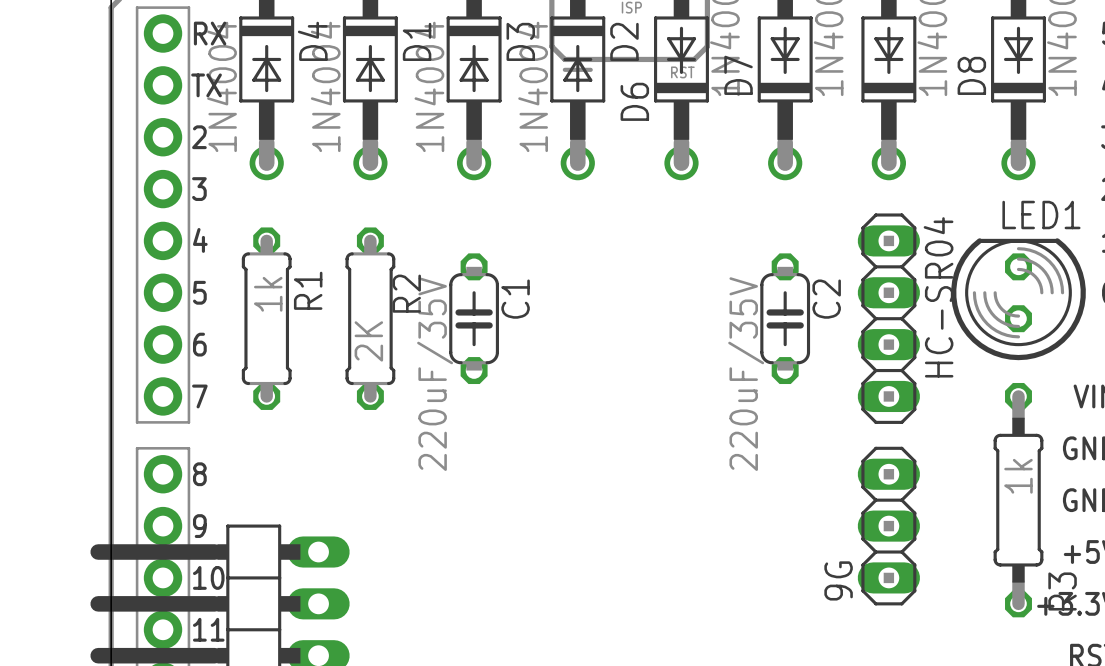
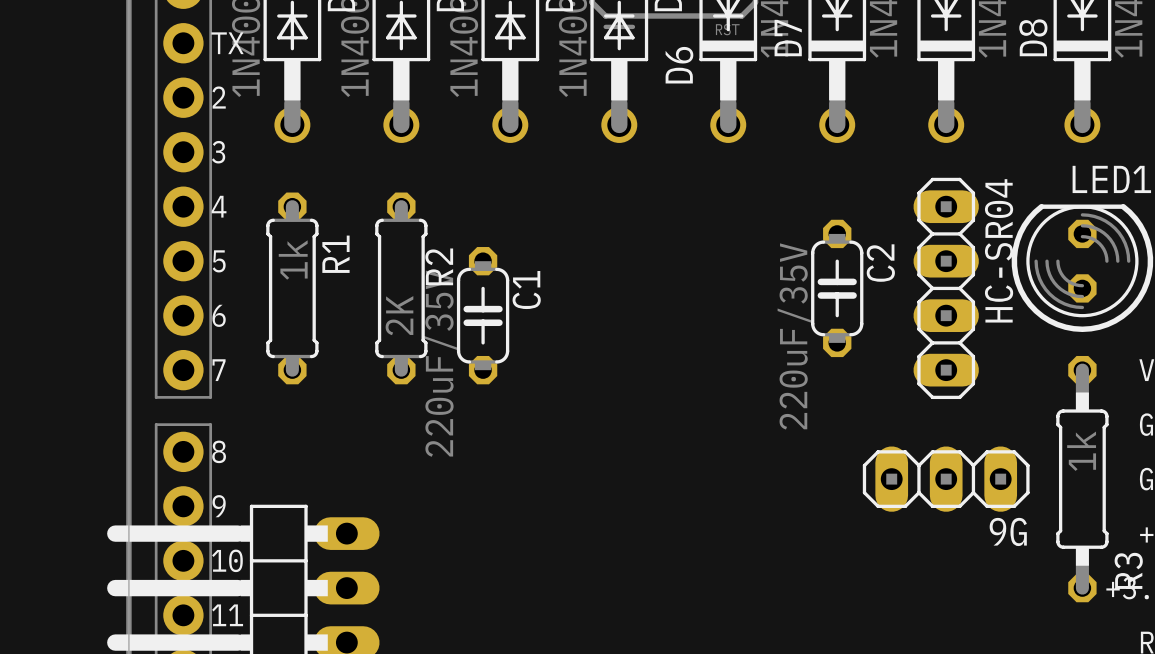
C1 position: (474, 318) -> (483, 315)
9G rotation: 0° (888, 526) -> 90° clockwise (946, 479)
9G name position: 9G (838, 580) -> 9G (1008, 531)

